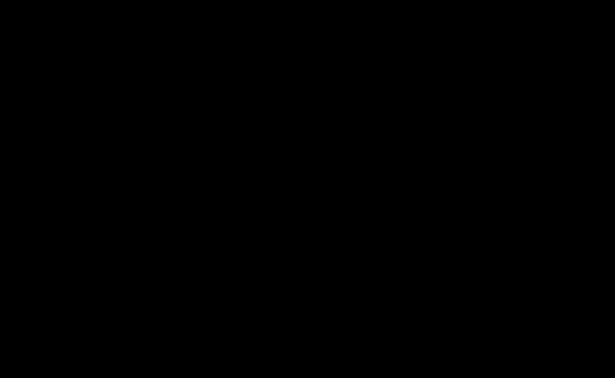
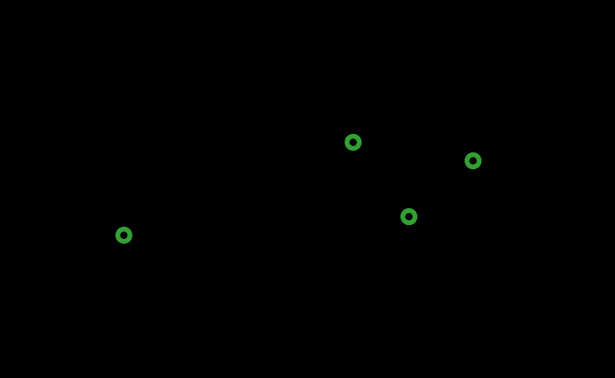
via: none -> (353, 142)
via: none -> (473, 160)
via: none -> (408, 216)
via: none -> (123, 235)

